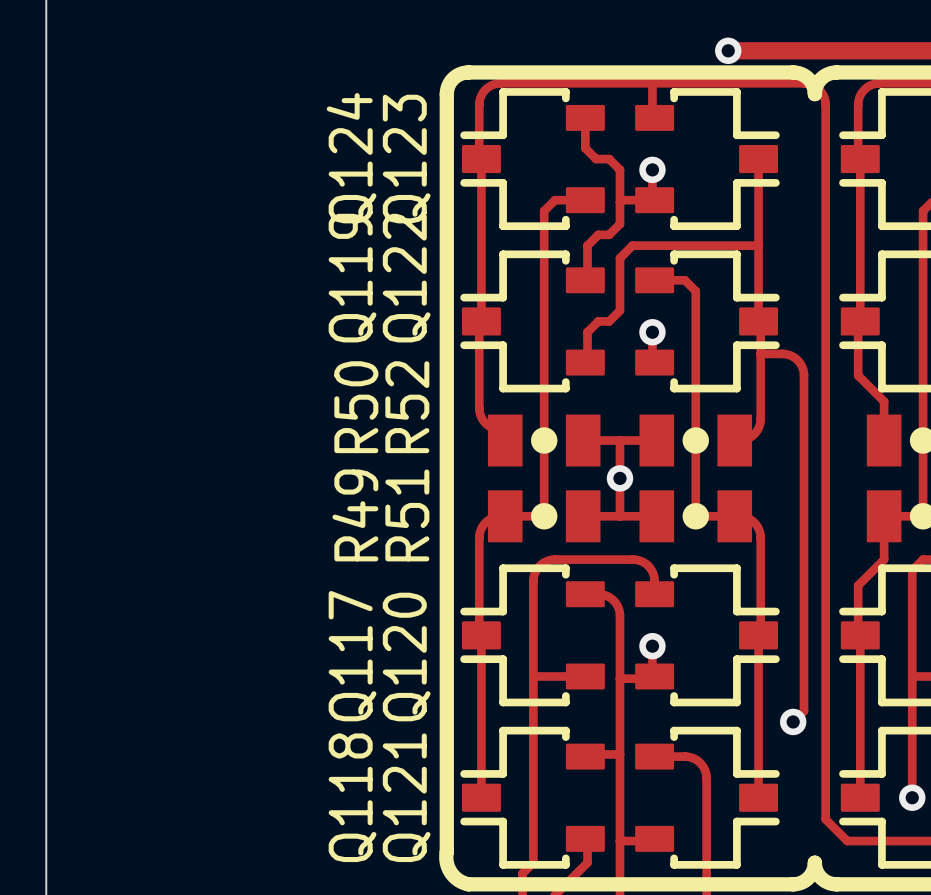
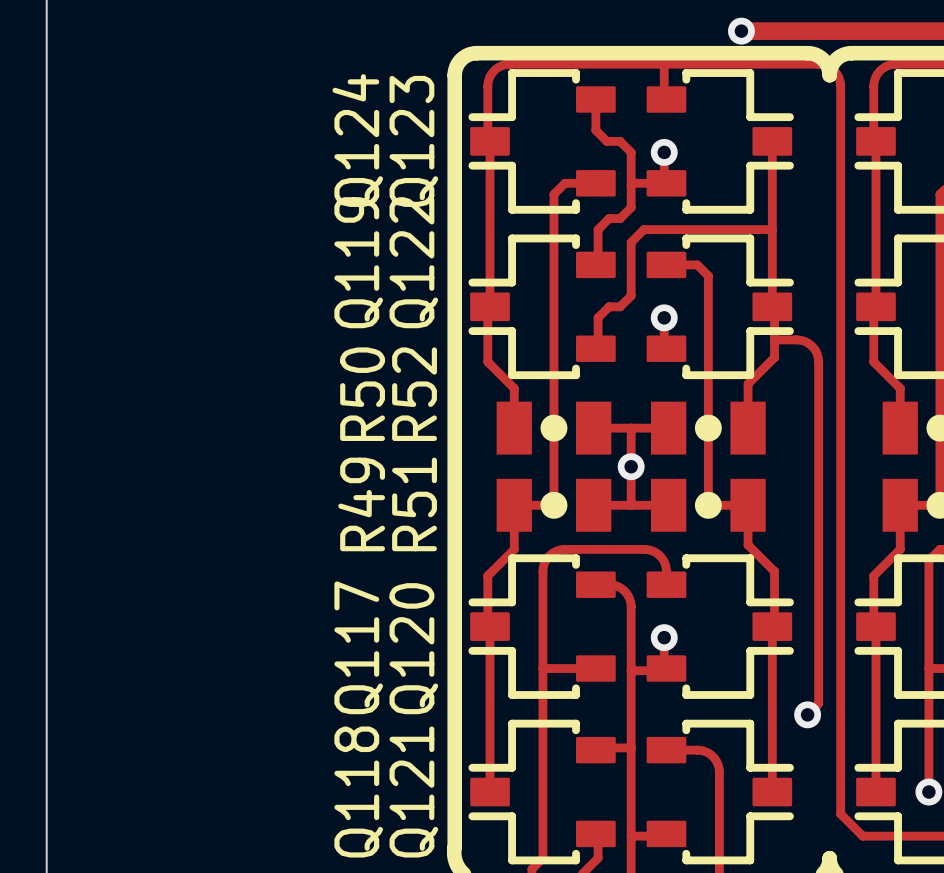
track: (760, 371) (759, 427) (749, 437) (734, 440) -> (774, 357) (748, 384) (748, 428)
track: (479, 375) (480, 416) (490, 426) (505, 429) -> (487, 361) (514, 388) (514, 417)
track: (505, 516) (490, 519) (480, 529) (479, 585) -> (514, 505) (514, 549) (487, 575)
track: (734, 516) (749, 519) (759, 529) (760, 581) -> (748, 505) (748, 545) (774, 571)

